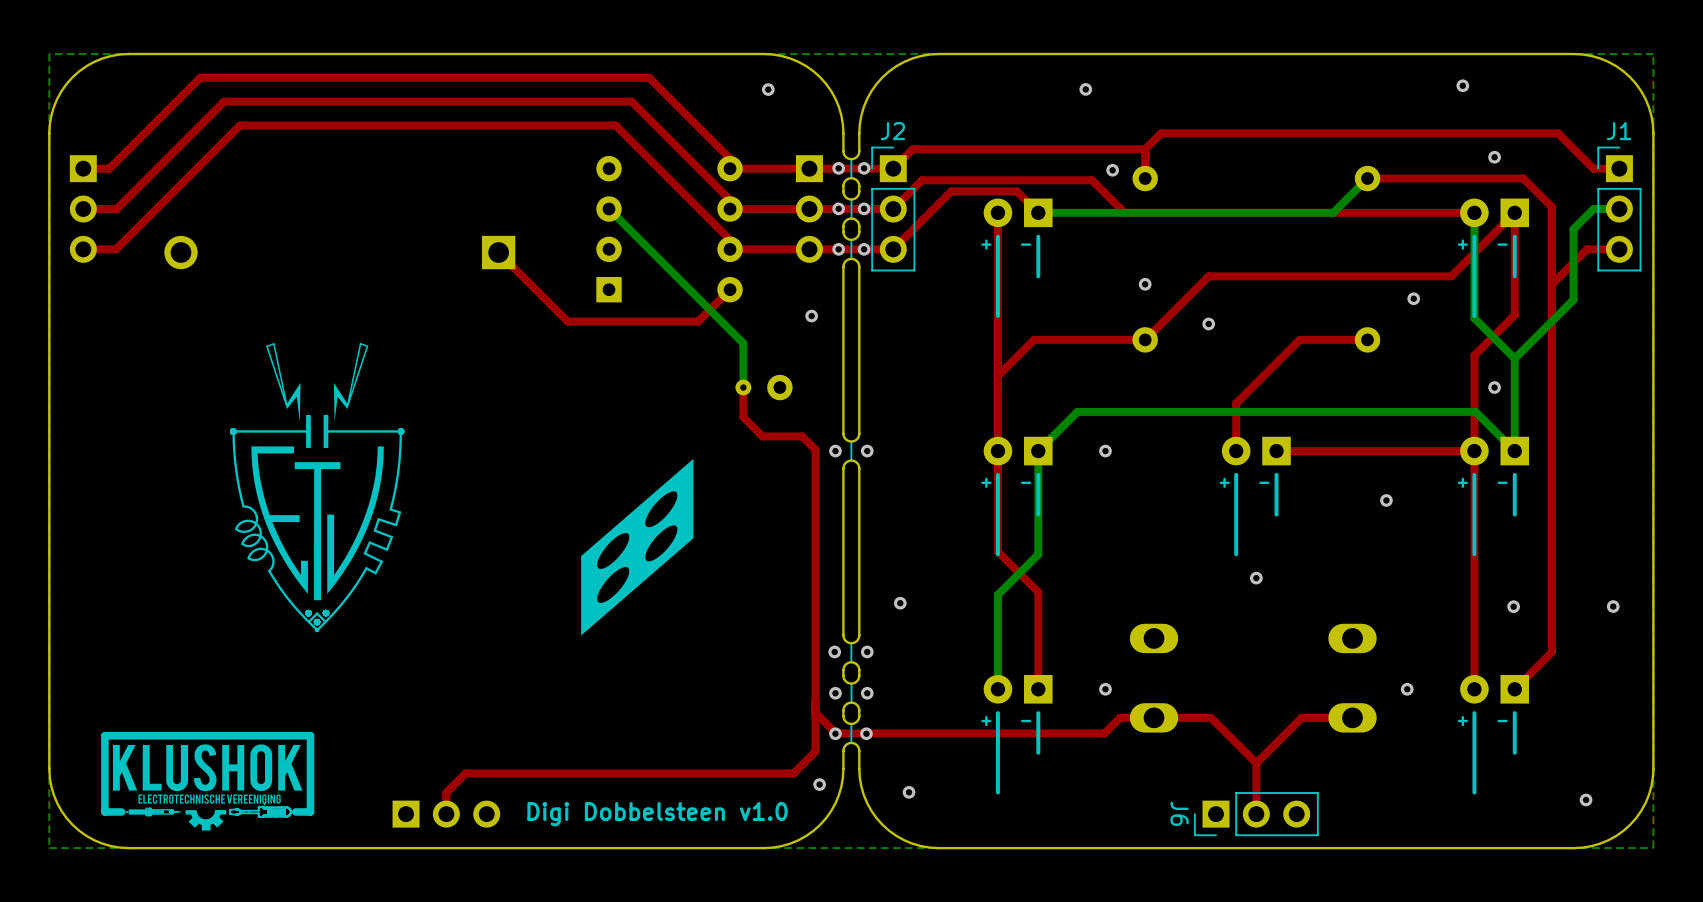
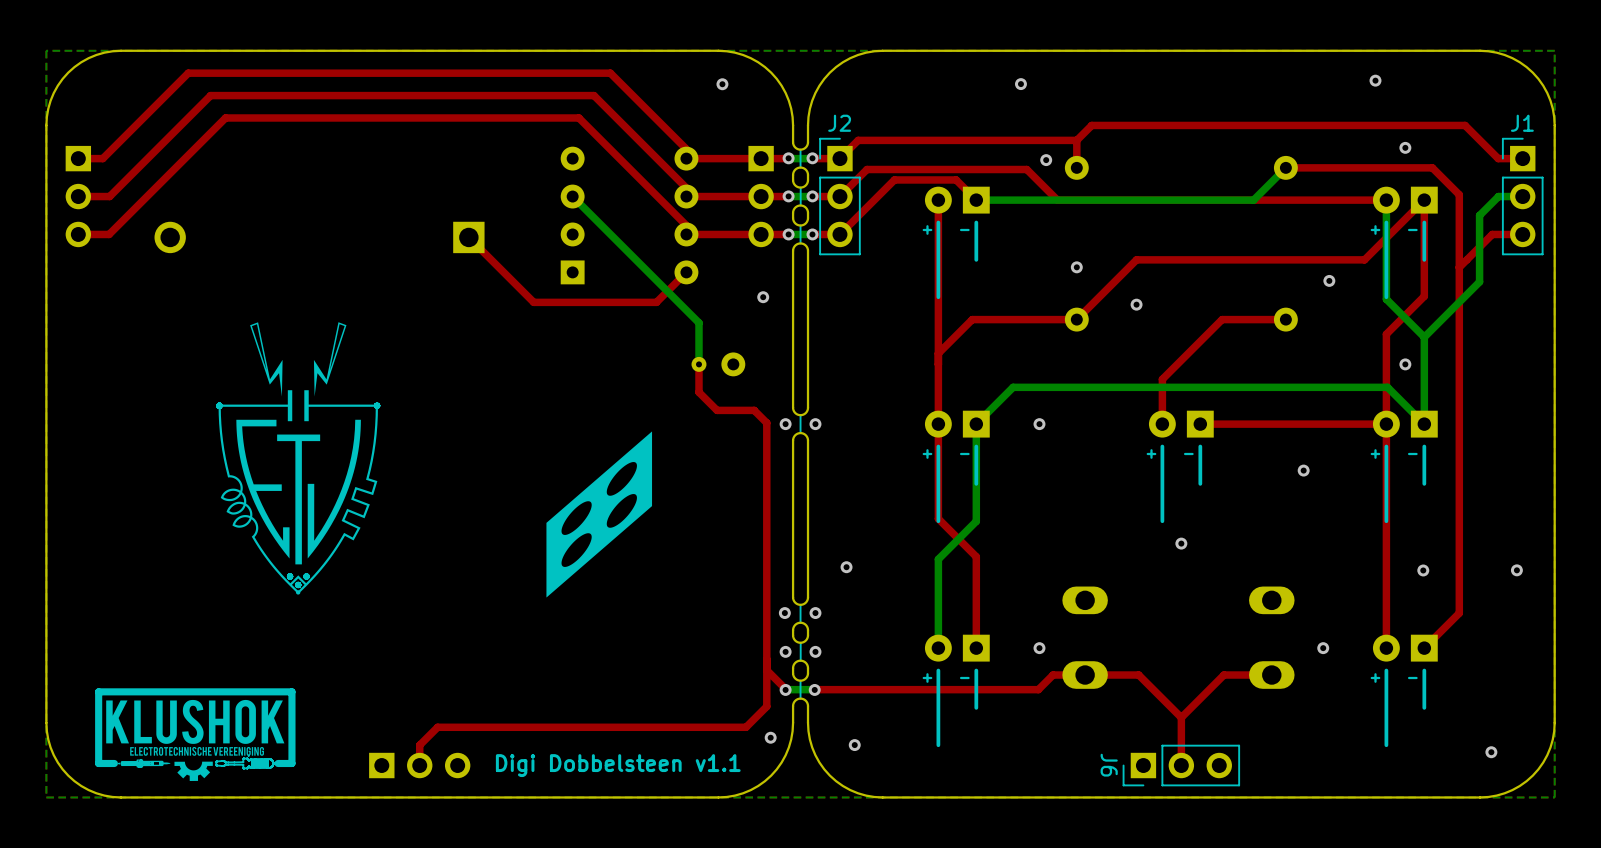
top track: (863, 168) (838, 168) -> none
bottom track: none -> (812, 158) (788, 158)
top track: (863, 209) (838, 209) -> none
bottom track: none -> (812, 196) (788, 196)
top track: (864, 249) (838, 249) -> none
bottom track: none -> (812, 234) (788, 234)
top track: (866, 733) (836, 733) -> none
bottom track: none -> (814, 689) (786, 689)
text: Digi Dobbelsteen v1.0 (657, 814) -> Digi Dobbelsteen v1.1 (618, 765)

